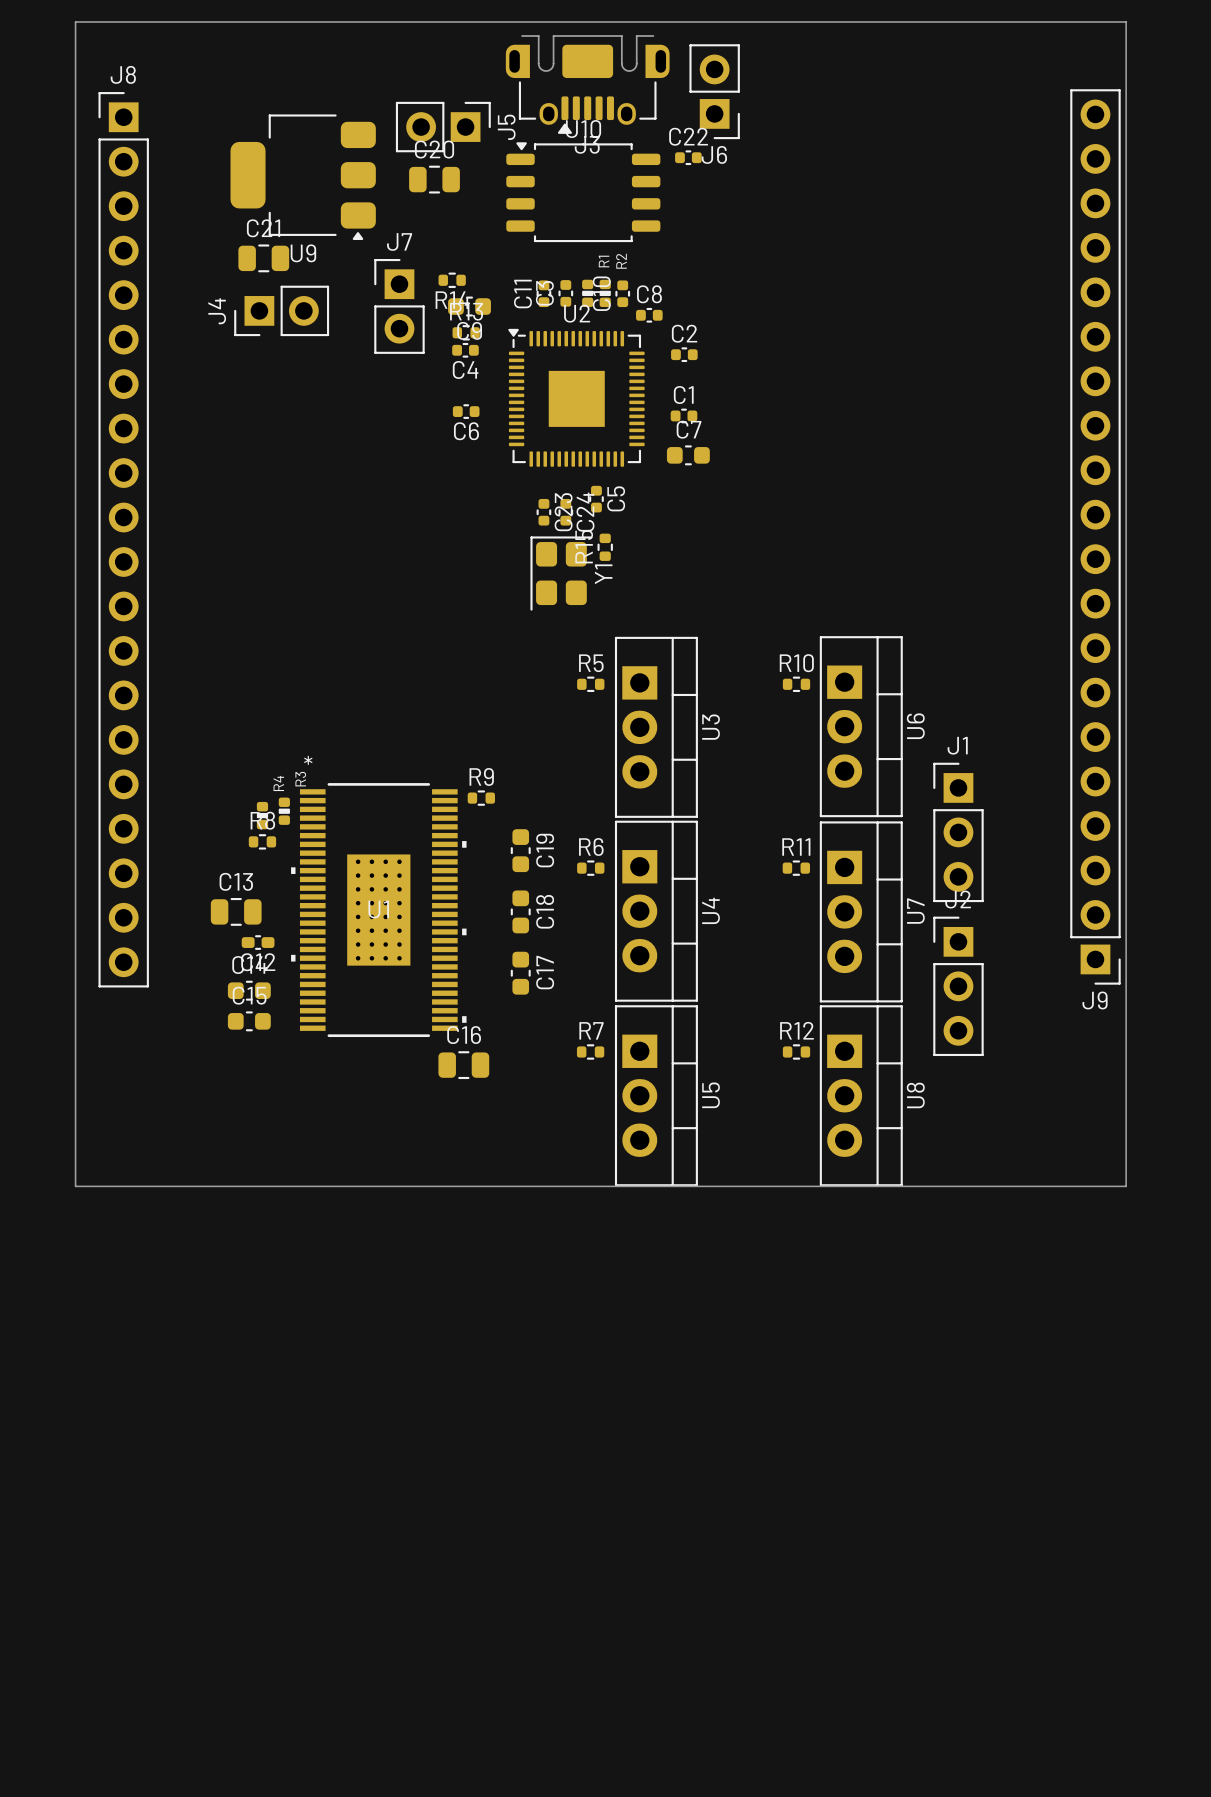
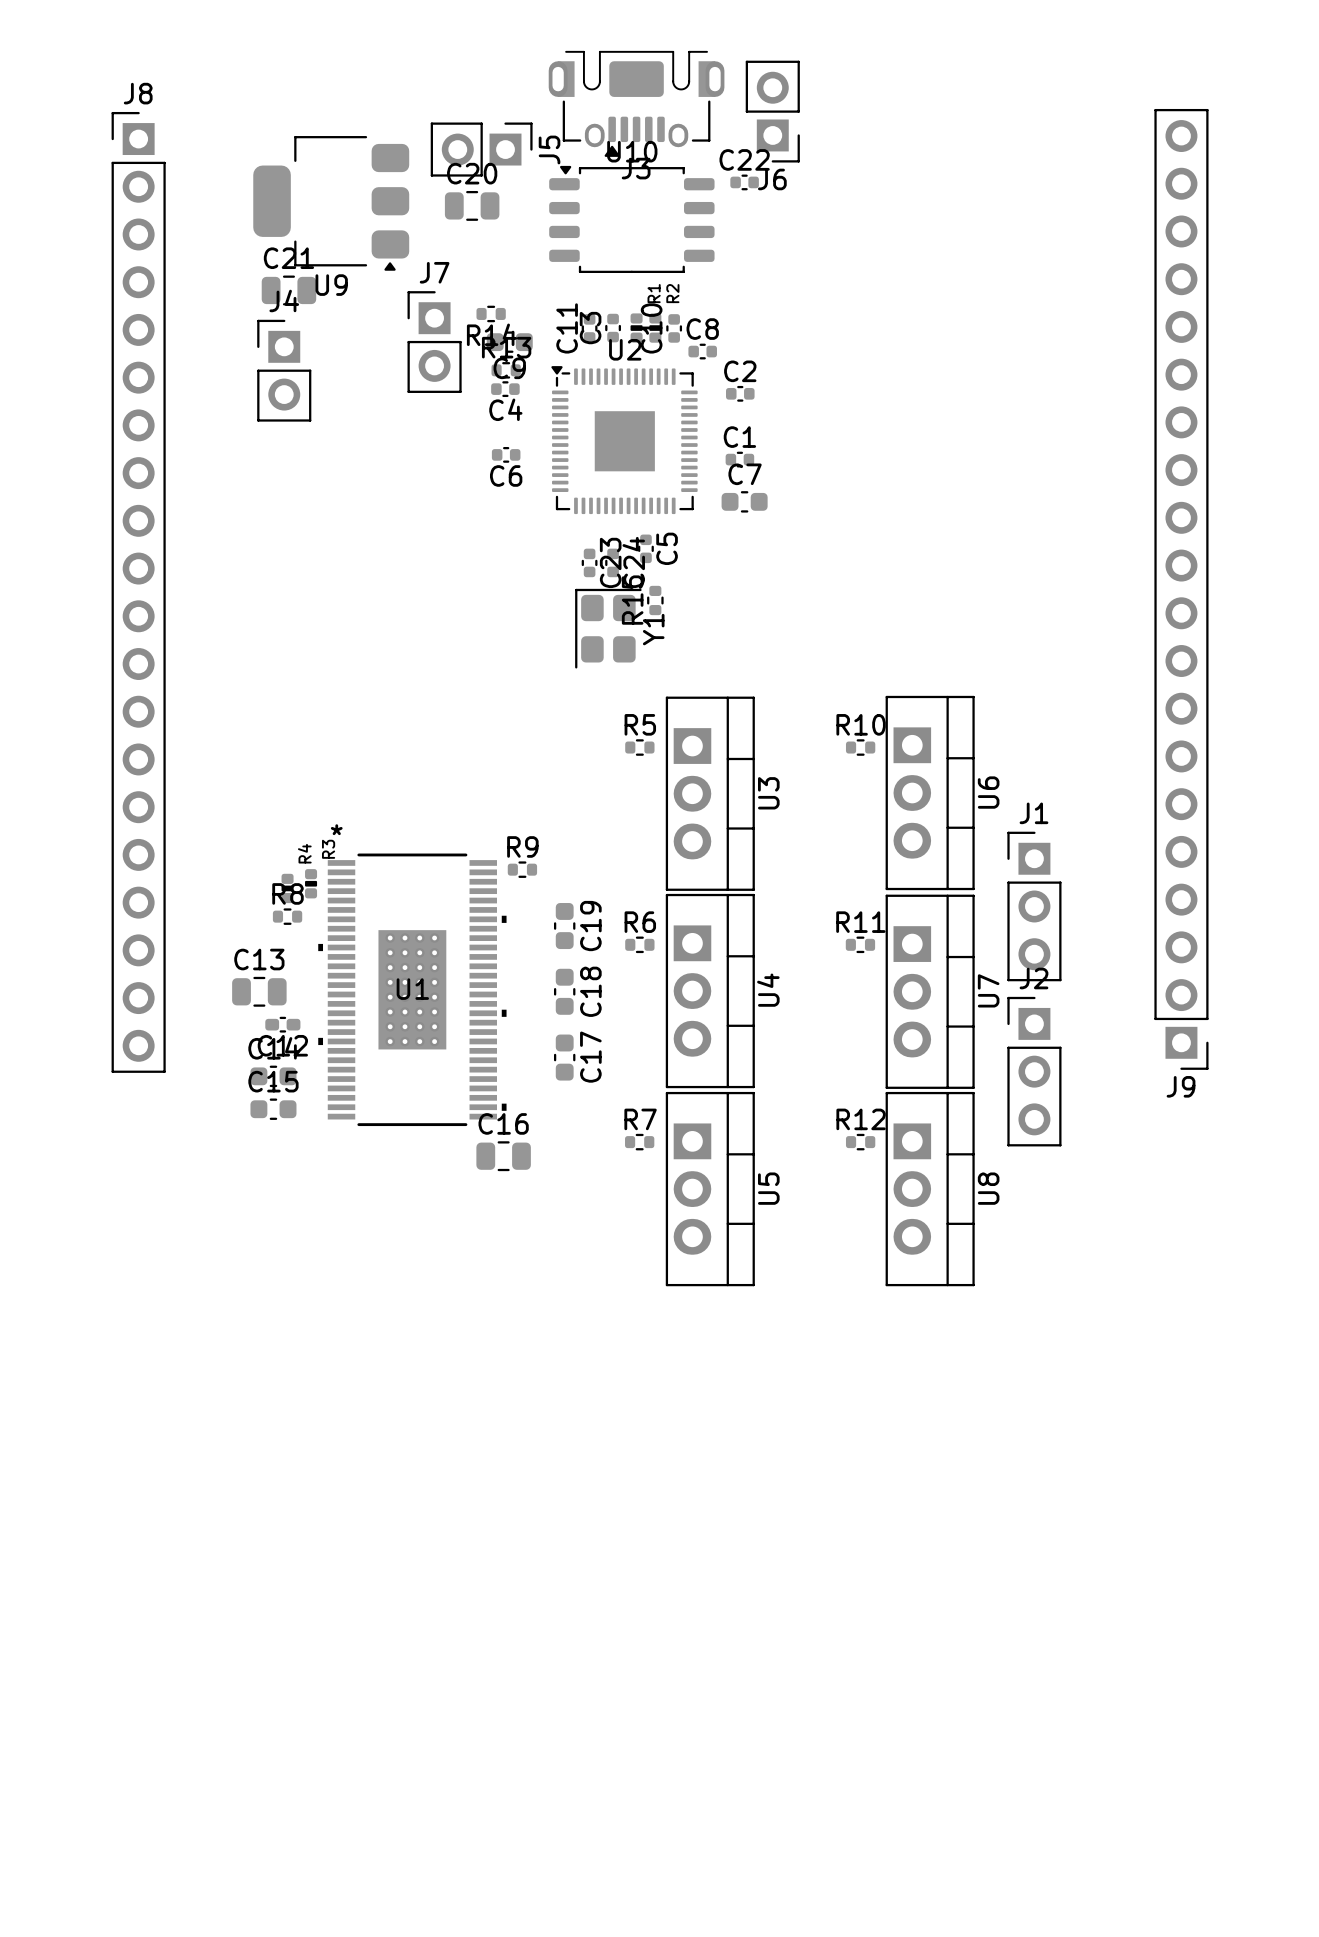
board edge: (75, 22) (1126, 22) (1126, 1186) (75, 1186) (75, 22) -> none
J4 rotation: 0° (281, 310) -> 90° clockwise (284, 370)

